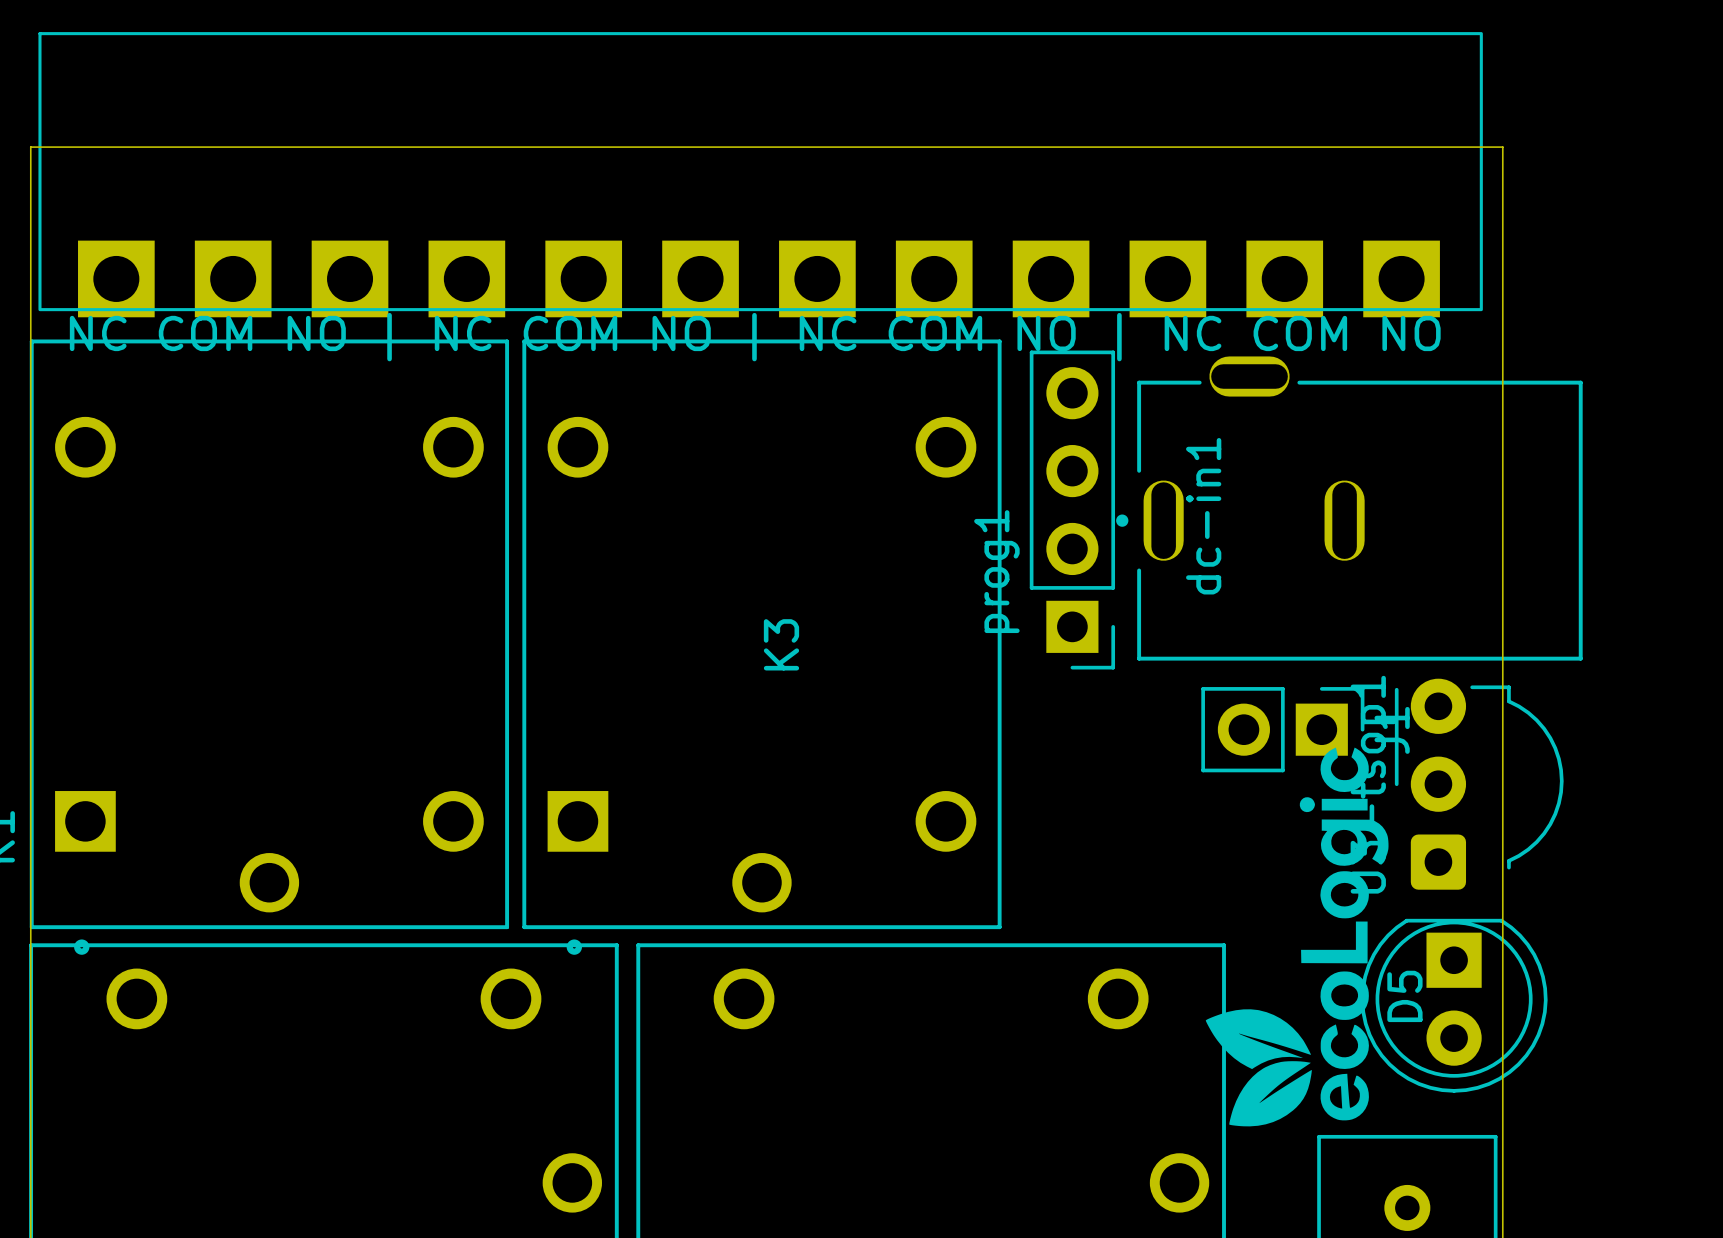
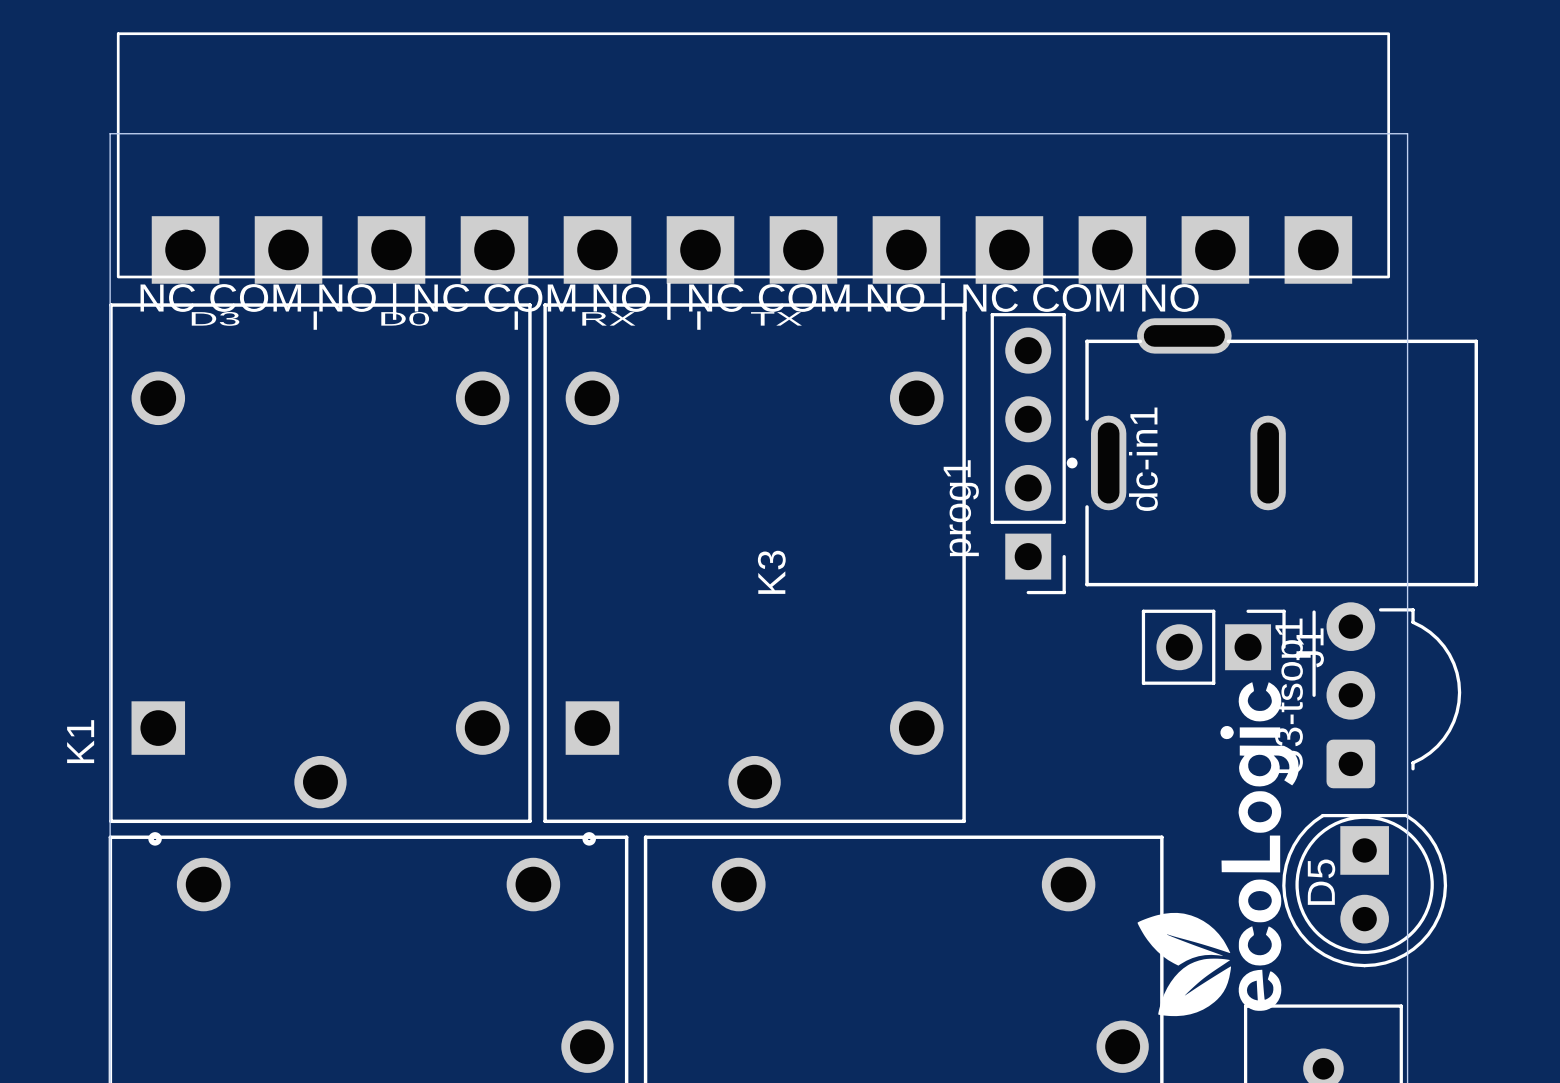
dc-in1 footprint: [1116, 356, 1583, 661] -> [1066, 318, 1478, 587]
text: none -> D3 | D0 | RX | TX (496, 320)
drawing position: (1297, 936) -> (1218, 849)

